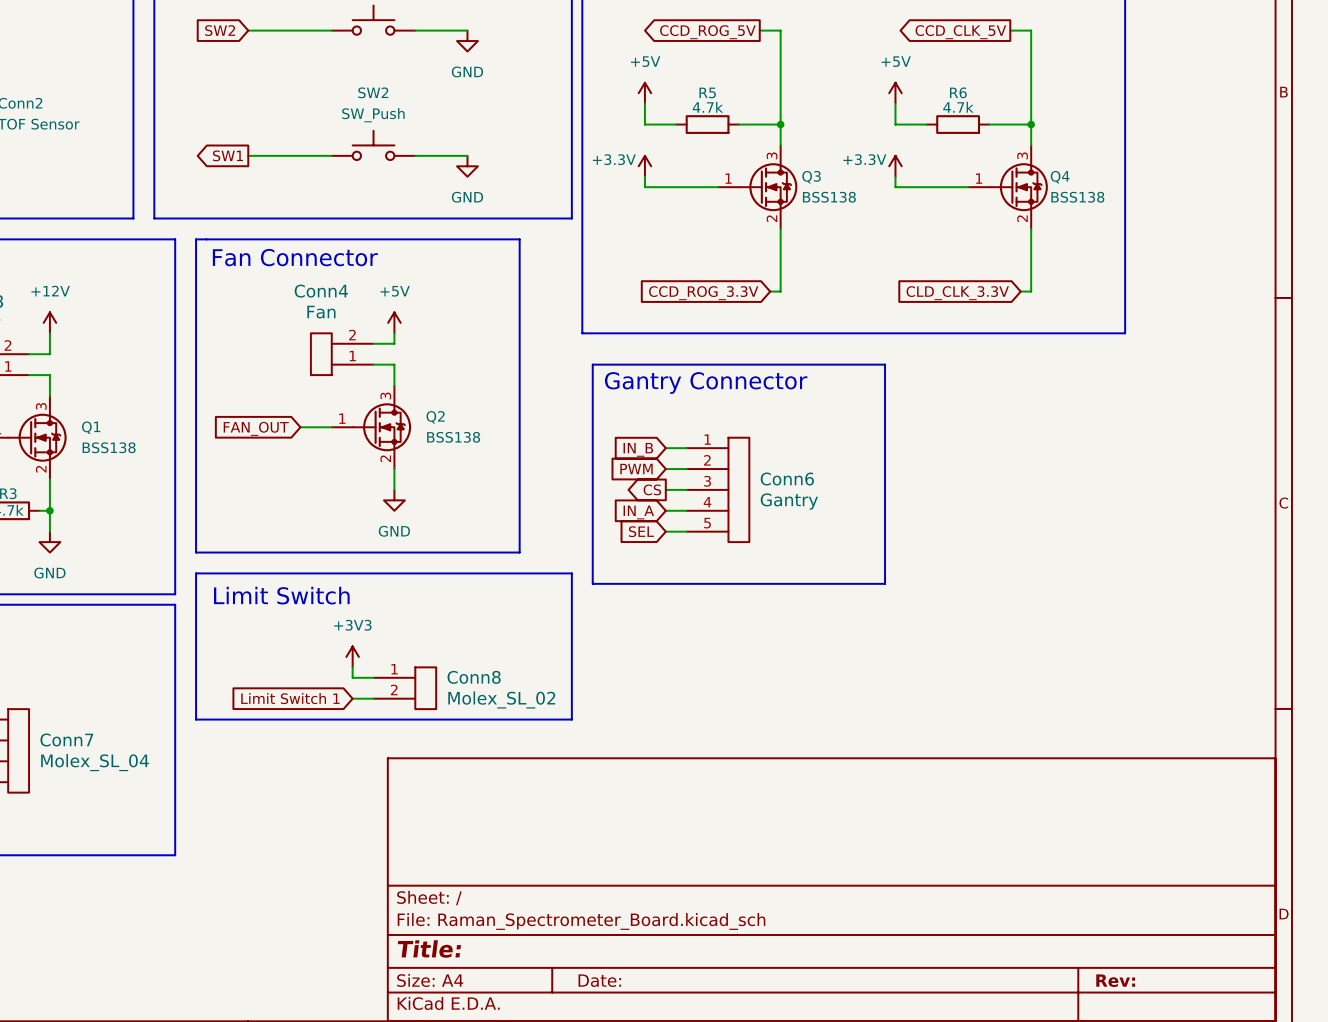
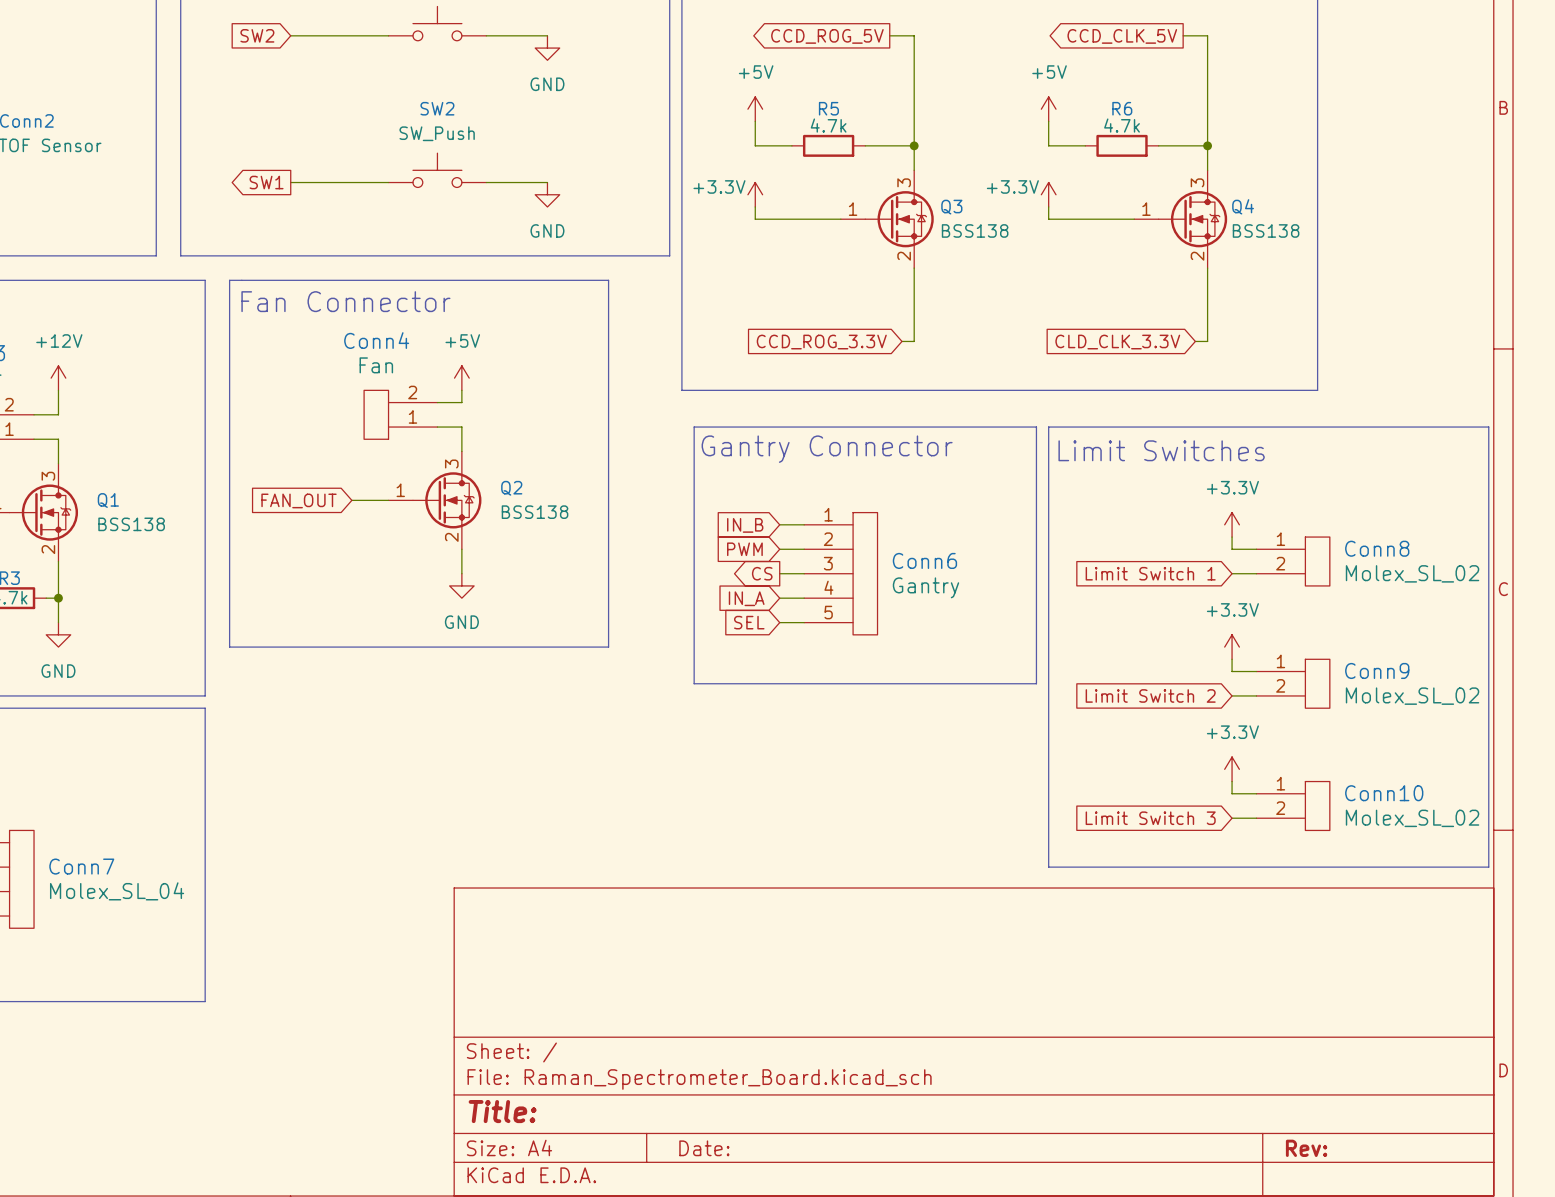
line: none -> (1048, 427) (1488, 427) (1488, 867) (1048, 867) (1048, 427)
text: none -> Limit Switches (1161, 450)
power symbol: none -> +3.3V (1232, 524)
wire: none -> (1232, 537) (1232, 549) (1256, 549)
global label: none -> Limit Switch 1 (1150, 573)
wire: none -> (1232, 573) (1256, 573)
power symbol: none -> +3.3V (1232, 647)
wire: none -> (1232, 659) (1232, 671) (1256, 671)
line: (196, 573) (196, 719) (571, 719) (571, 573) (196, 573) -> none
Conn9: none -> Molex_SL_02 (1293, 683)
global label: none -> Limit Switch 2 (1150, 695)
wire: none -> (1232, 695) (1256, 695)
text: Limit Switch (281, 595) -> none
power symbol: +3V3 (352, 656) -> none
power symbol: none -> +3.3V (1232, 769)
wire: (352, 667) (352, 677) (373, 677) -> none
wire: none -> (1232, 781) (1232, 793) (1256, 793)
Conn8 position: (404, 688) -> (1293, 561)
Conn10: none -> Molex_SL_02 (1293, 805)
global label: Limit Switch 1 (290, 698) -> none
wire: (352, 698) (373, 698) -> none
global label: none -> Limit Switch 3 (1150, 818)
wire: none -> (1232, 818) (1256, 818)

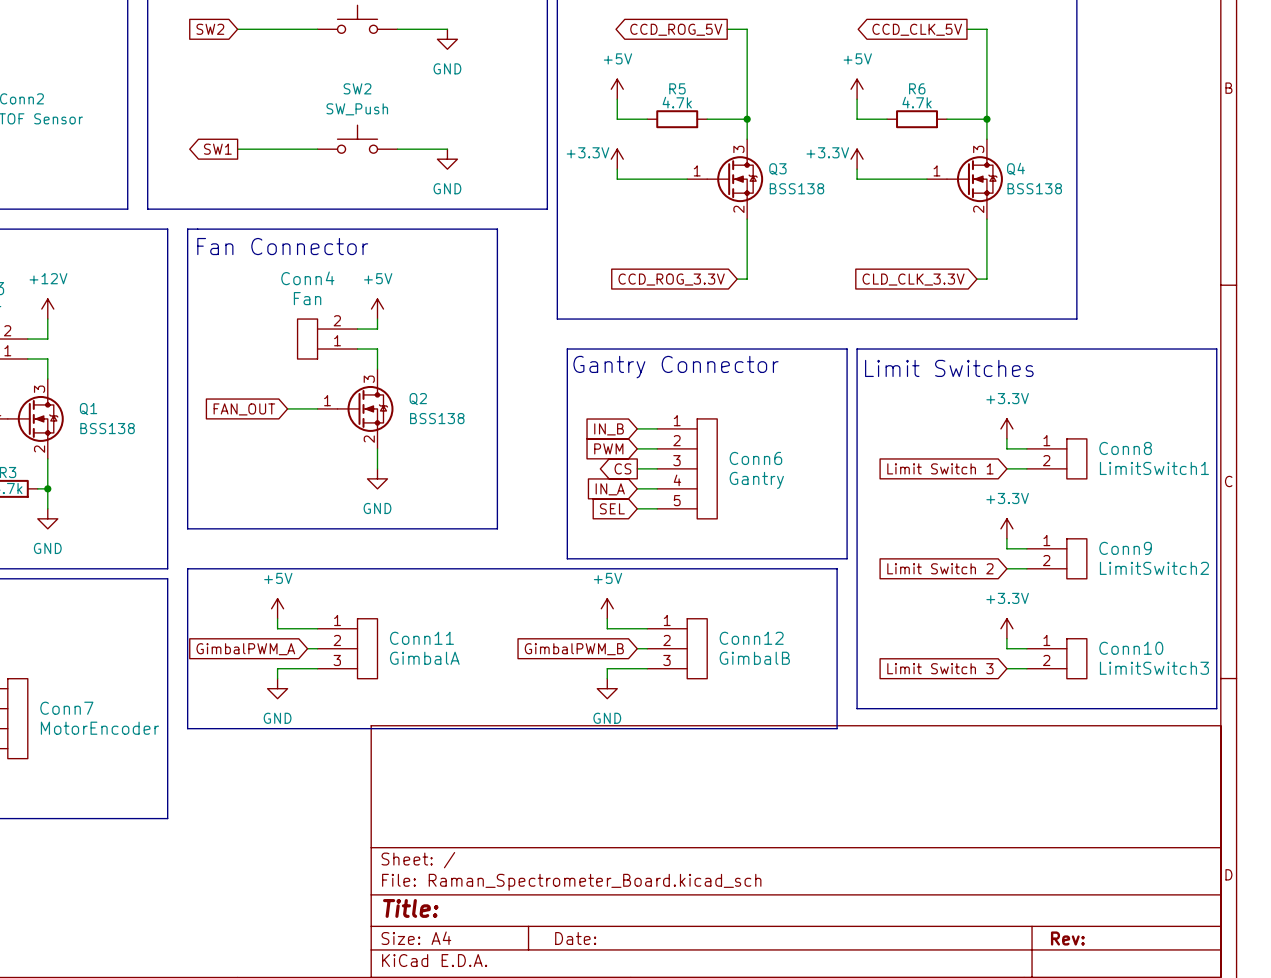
Conn8 value: Molex_SL_02 (1412, 573) -> LimitSwitch1 (1154, 468)
line: none -> (187, 568) (837, 568) (837, 728) (187, 728) (187, 568)
Conn9 value: Molex_SL_02 (1412, 696) -> LimitSwitch2 (1154, 568)
power symbol: none -> +5V (277, 608)
power symbol: none -> +5V (607, 608)
wire: none -> (277, 618) (277, 628) (317, 628)
wire: none -> (607, 618) (607, 628) (647, 628)
wire: none -> (307, 648) (317, 648)
Conn11: none -> GimbalA (347, 648)
wire: none -> (637, 648) (647, 648)
Conn12: none -> GimbalB (677, 648)
global label: none -> GimbalPWM_A (245, 649)
global label: none -> GimbalPWM_B (574, 649)
wire: none -> (317, 668) (277, 668) (277, 678)
wire: none -> (647, 668) (607, 668) (607, 678)
Conn10 value: Molex_SL_02 (1412, 818) -> LimitSwitch3 (1154, 668)
power symbol: none -> GND (277, 688)
power symbol: none -> GND (607, 688)
Conn7 value: Molex_SL_04 (117, 891) -> MotorEncoder (99, 728)

